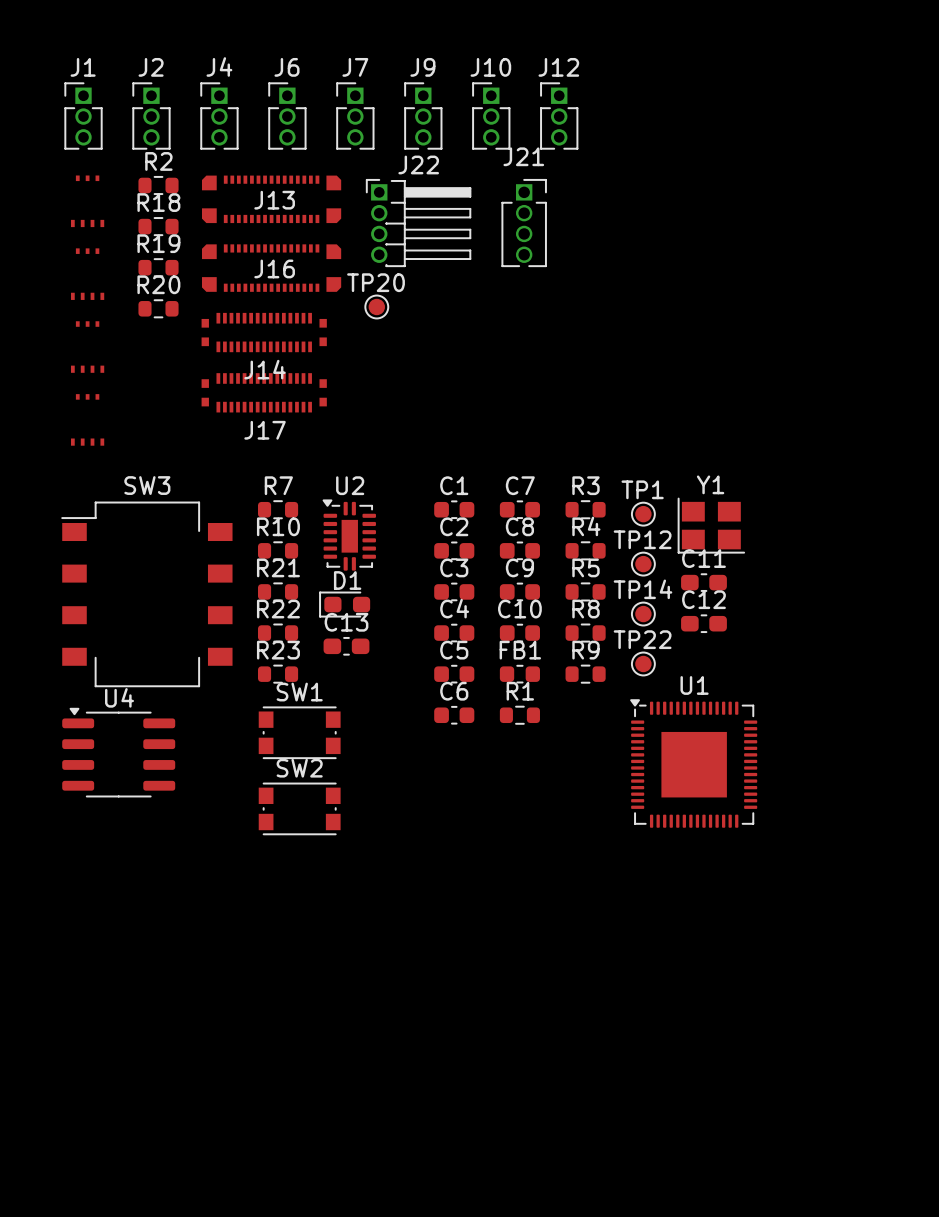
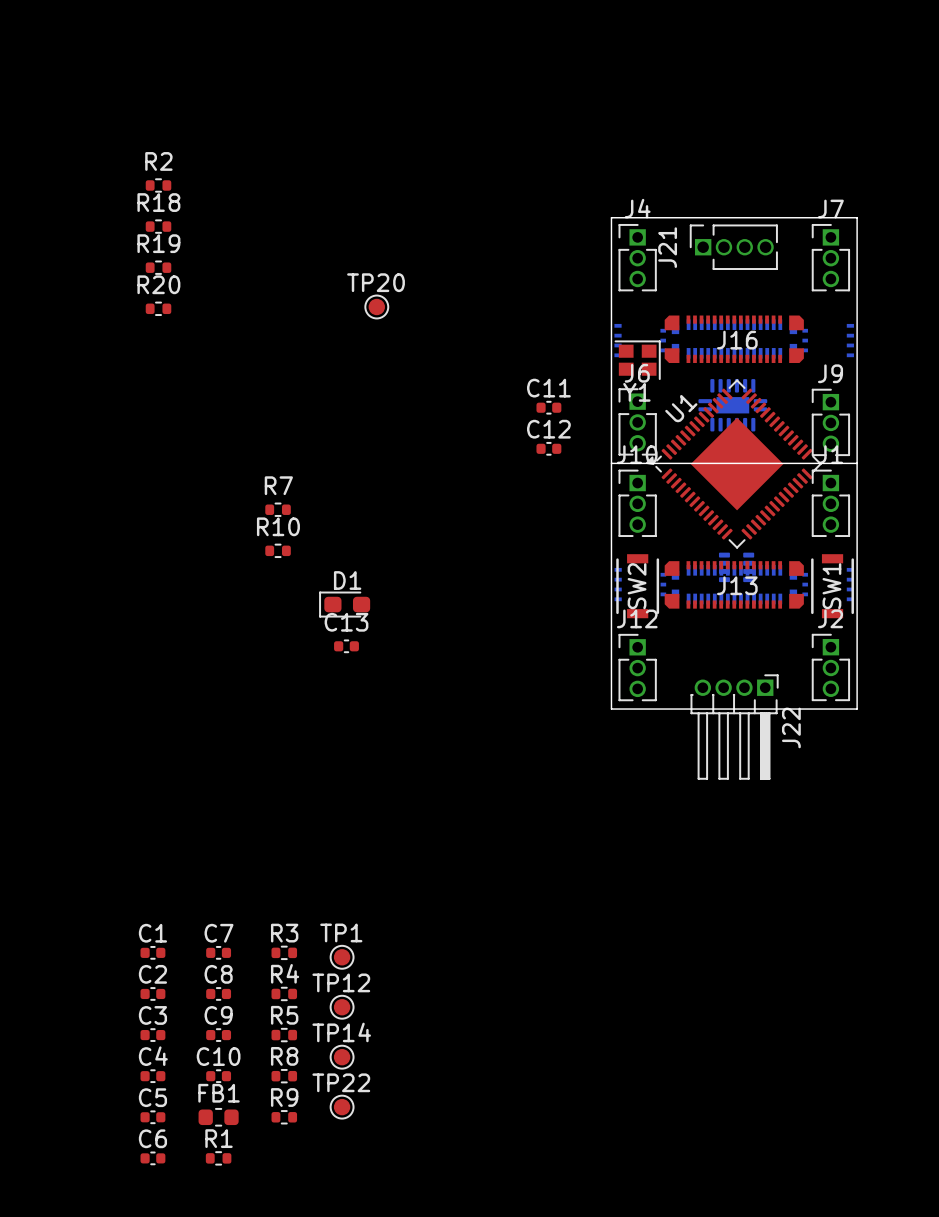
J1 position: (83, 116) -> (830, 503)
J2 position: (151, 116) -> (830, 667)
J4 position: (219, 116) -> (637, 257)
J6 position: (287, 116) -> (637, 421)
J7 position: (355, 116) -> (830, 257)
J9 position: (423, 116) -> (830, 422)
J10 position: (491, 116) -> (637, 503)
J12 position: (559, 116) -> (637, 667)
R2 footprint: [138, 175, 179, 196] -> [145, 178, 172, 193]
J13 position: (271, 199) -> (734, 584)
part: (87, 201) -> none
R18 footprint: [138, 217, 179, 237] -> [145, 219, 172, 234]
board edge: none -> (611, 217) (857, 217) (857, 709) (611, 709) (611, 217)
J22 rotation: 0° (418, 223) -> 90° clockwise (734, 727)
J22 position: (418, 223) -> (734, 727)
J21 rotation: 0° (524, 223) -> 90° counterclockwise (733, 247)
J21 position: (524, 223) -> (733, 247)
R19 footprint: [138, 258, 179, 278] -> [145, 260, 172, 275]
J16 position: (271, 268) -> (734, 339)
part: (87, 274) -> none
R20 footprint: [138, 299, 179, 319] -> [145, 301, 172, 317]
J14: (264, 332) -> none
part: none -> (734, 339)
part: none -> (640, 340)
part: none -> (828, 340)
part: (87, 347) -> none
J17: (264, 392) -> none
part: (87, 419) -> none
board edge: none -> (611, 463) (857, 463)
Y1 name position: Y1 (710, 484) -> Y1 (636, 392)
Y1 footprint: [677, 497, 746, 554] -> [614, 340, 661, 381]
R7 footprint: [257, 500, 299, 520] -> [265, 502, 291, 517]
C1 footprint: [434, 500, 475, 520] -> [140, 945, 166, 960]
C7 footprint: [499, 500, 540, 520] -> [206, 945, 232, 960]
R3 footprint: [565, 500, 606, 520] -> [271, 945, 298, 961]
TP1 position: (643, 514) -> (342, 957)
U2 side: top (349, 535) -> bottom (732, 405)
R10 footprint: [257, 541, 299, 561] -> [265, 543, 291, 559]
C2 footprint: [434, 541, 475, 561] -> [140, 987, 166, 1001]
C8 footprint: [499, 541, 540, 561] -> [206, 987, 232, 1001]
R4 footprint: [565, 541, 606, 561] -> [271, 986, 298, 1002]
TP12 position: (643, 564) -> (342, 1007)
part: none -> (736, 567)
C11 footprint: [681, 573, 727, 592] -> [536, 400, 562, 415]
C3 footprint: [434, 582, 475, 602] -> [140, 1028, 166, 1042]
C9 footprint: [499, 582, 540, 602] -> [206, 1028, 232, 1042]
R5 footprint: [565, 582, 606, 602] -> [271, 1027, 298, 1043]
part: none -> (640, 584)
part: none -> (734, 584)
part: none -> (828, 584)
R21: (278, 591) -> none
SW3: (146, 594) -> none
TP14 position: (643, 614) -> (342, 1057)
C12 footprint: [681, 614, 727, 634] -> [536, 441, 562, 456]
C4 footprint: [434, 623, 475, 643] -> [140, 1069, 166, 1084]
C10 footprint: [499, 623, 540, 643] -> [206, 1069, 232, 1084]
R8 footprint: [565, 623, 606, 643] -> [271, 1068, 298, 1084]
R22: (278, 633) -> none
C13 footprint: [323, 636, 370, 656] -> [334, 639, 359, 654]
TP22 position: (643, 663) -> (342, 1107)
C5 footprint: [434, 664, 475, 684] -> [140, 1110, 166, 1125]
R9 footprint: [565, 664, 606, 684] -> [271, 1110, 298, 1125]
R23: (278, 674) -> none
FB1 position: (519, 674) -> (218, 1117)
SW1 name position: SW1 (299, 692) -> SW1 (831, 586)
C6 footprint: [434, 705, 475, 725] -> [140, 1151, 166, 1166]
R1 footprint: [499, 705, 540, 725] -> [205, 1151, 232, 1166]
SW1 footprint: [258, 706, 341, 760] -> [811, 554, 854, 619]
U4: (118, 752) -> none
U1 rotation: 0° (693, 763) -> 45° counterclockwise (733, 464)
U1 position: (693, 763) -> (733, 464)
SW2 name position: SW2 (299, 768) -> SW2 (637, 586)
SW2 footprint: [258, 782, 341, 836] -> [616, 554, 660, 619]

